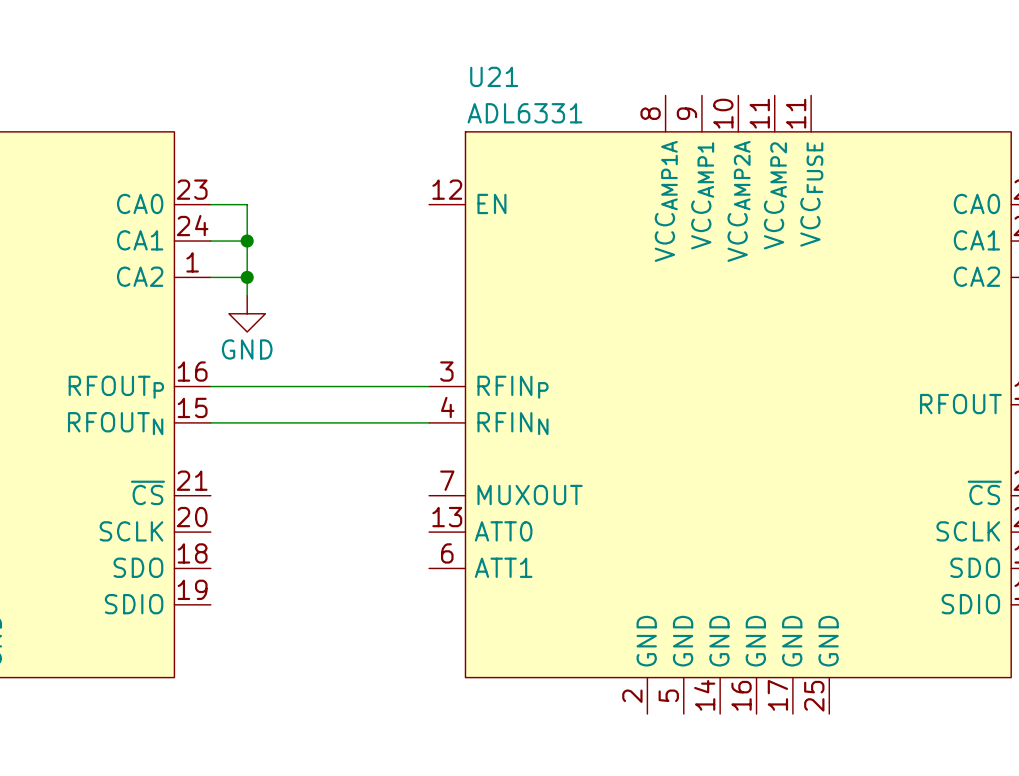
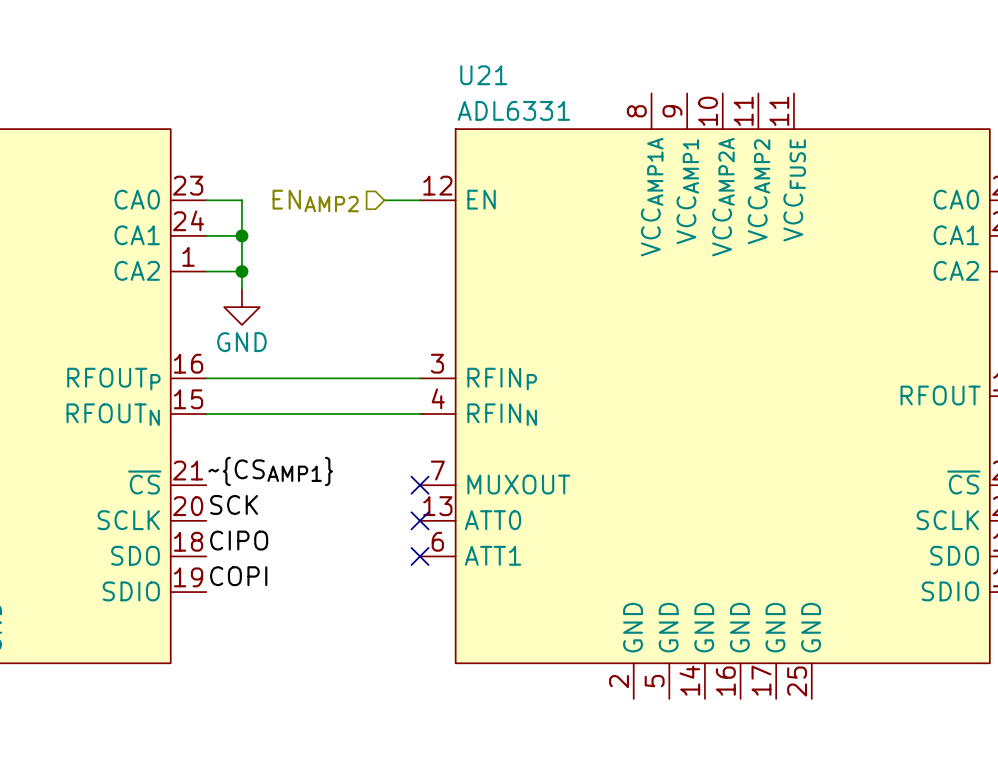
wire: none -> (384, 200) (420, 200)
hierarchical label: none -> ENAMP2 (315, 200)
label: none -> ~{CSAMP1} (270, 471)
no-connect mark: none -> (420, 485)
label: none -> SCK (234, 504)
no-connect mark: none -> (420, 520)
label: none -> CIPO (239, 540)
no-connect mark: none -> (420, 556)
label: none -> COPI (238, 576)

